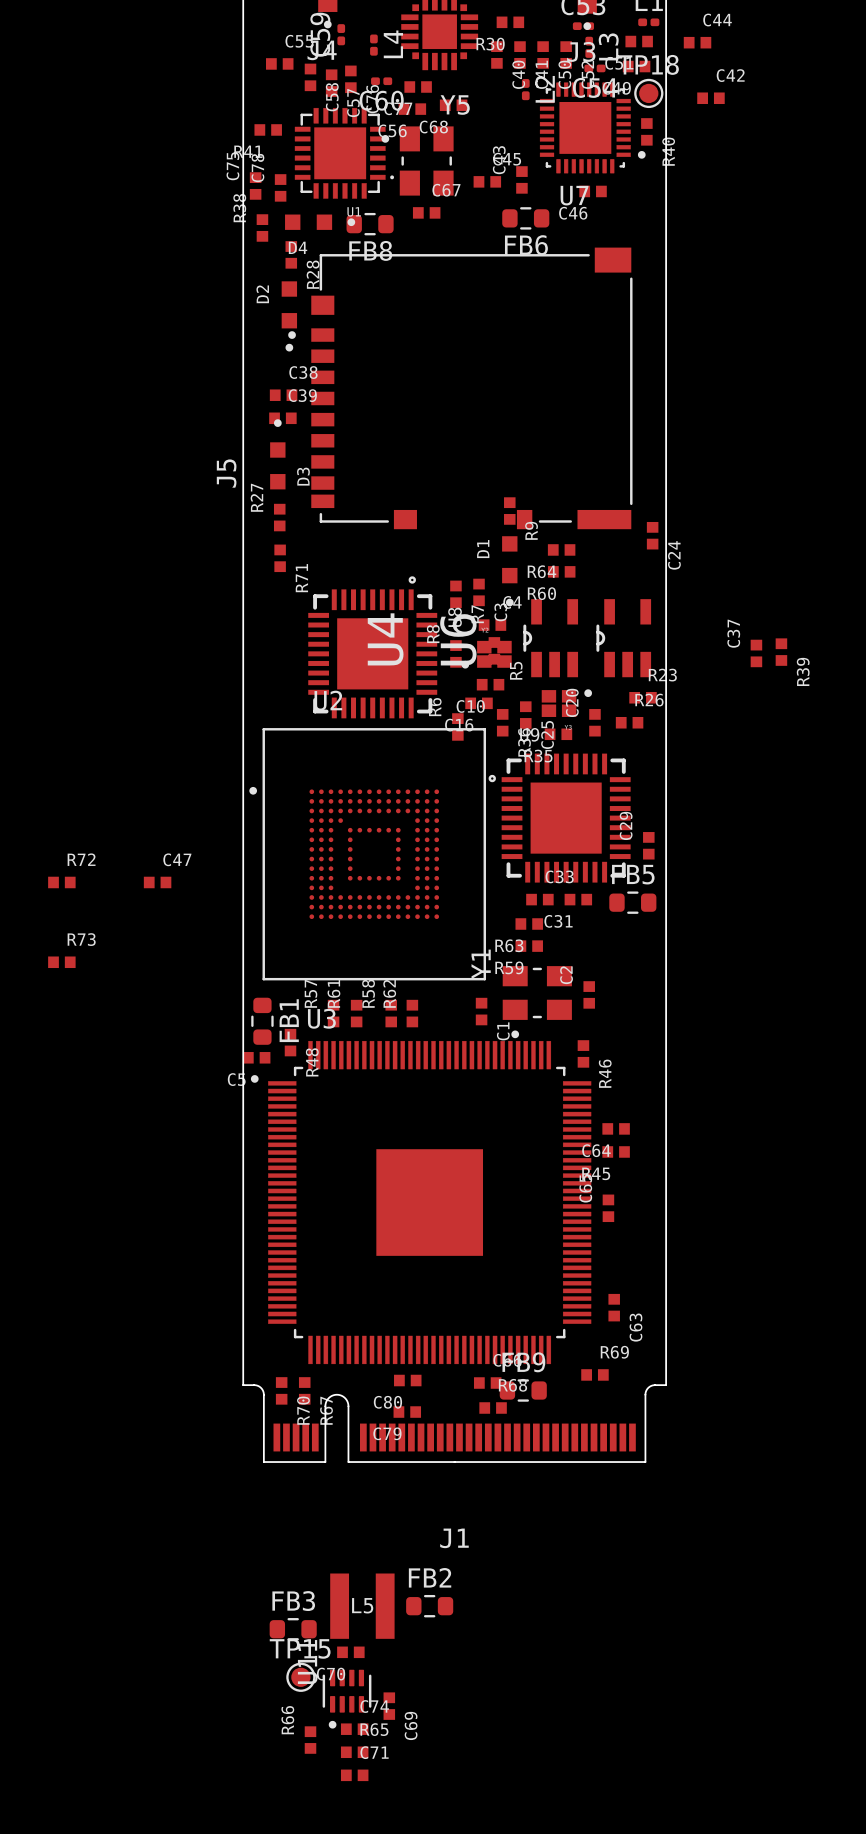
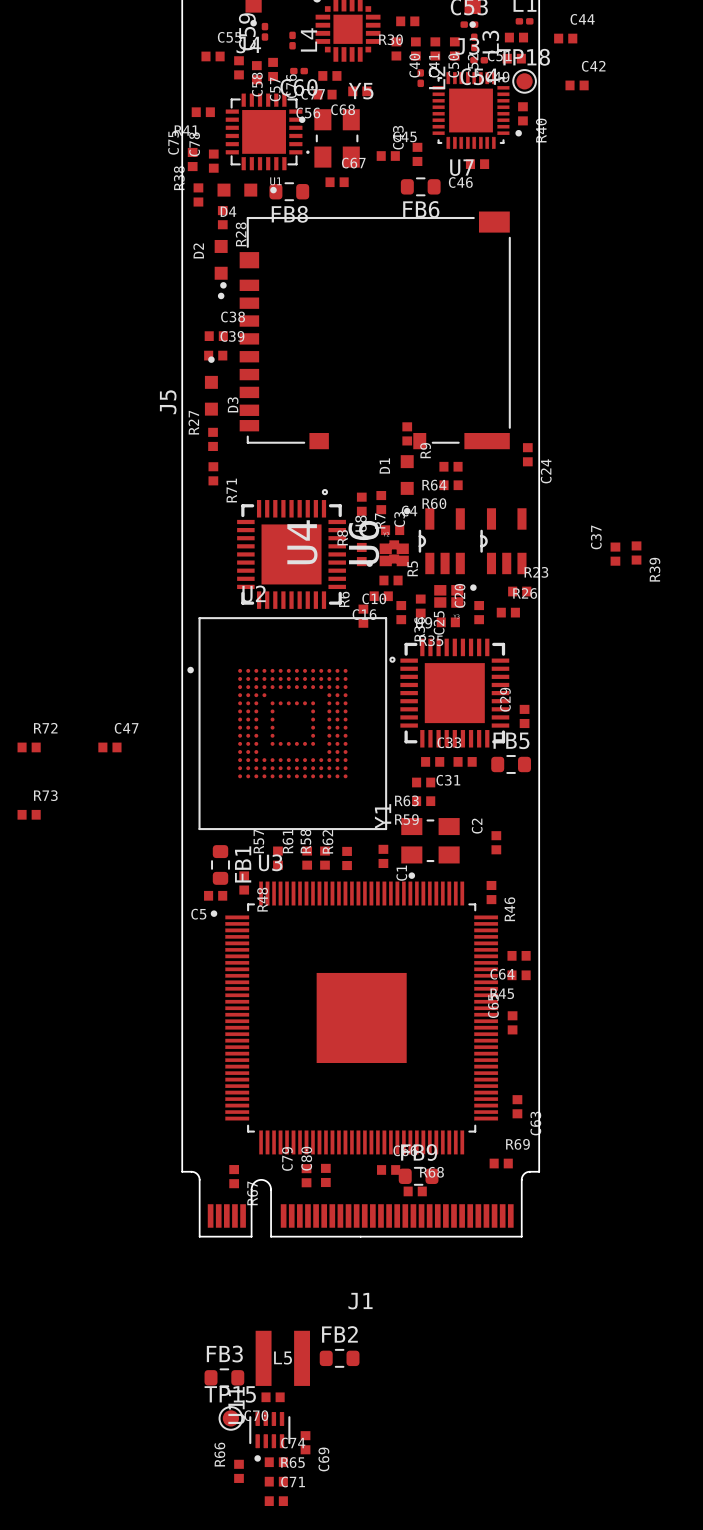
R61 name: R61 (333, 993) -> R57 (258, 841)
R58 name: R58 (368, 993) -> R61 (288, 841)
R62 name: R62 (389, 993) -> R58 (305, 841)
C2 position: (589, 994) -> (496, 842)
R57: (333, 1013) -> none
R62: none -> (347, 858)
FB1 position: (262, 1021) -> (220, 864)
R48 position: (290, 1042) -> (244, 882)
R46 position: (583, 1053) -> (491, 892)
C5 position: (256, 1057) -> (215, 895)
C64 position: (616, 1128) -> (519, 955)
R45 position: (616, 1151) -> (519, 975)
U3 position: (421, 1202) -> (354, 1017)
C65 position: (608, 1208) -> (512, 1022)
C63 position: (614, 1307) -> (517, 1106)
R69 position: (594, 1374) -> (501, 1163)
C80 rotation: 0° (407, 1380) -> 90° clockwise (325, 1175)
R70: (281, 1390) -> none
R68 position: (493, 1408) -> (415, 1191)
C79 rotation: 0° (407, 1412) -> 90° clockwise (306, 1175)
C79 position: (407, 1412) -> (306, 1175)

